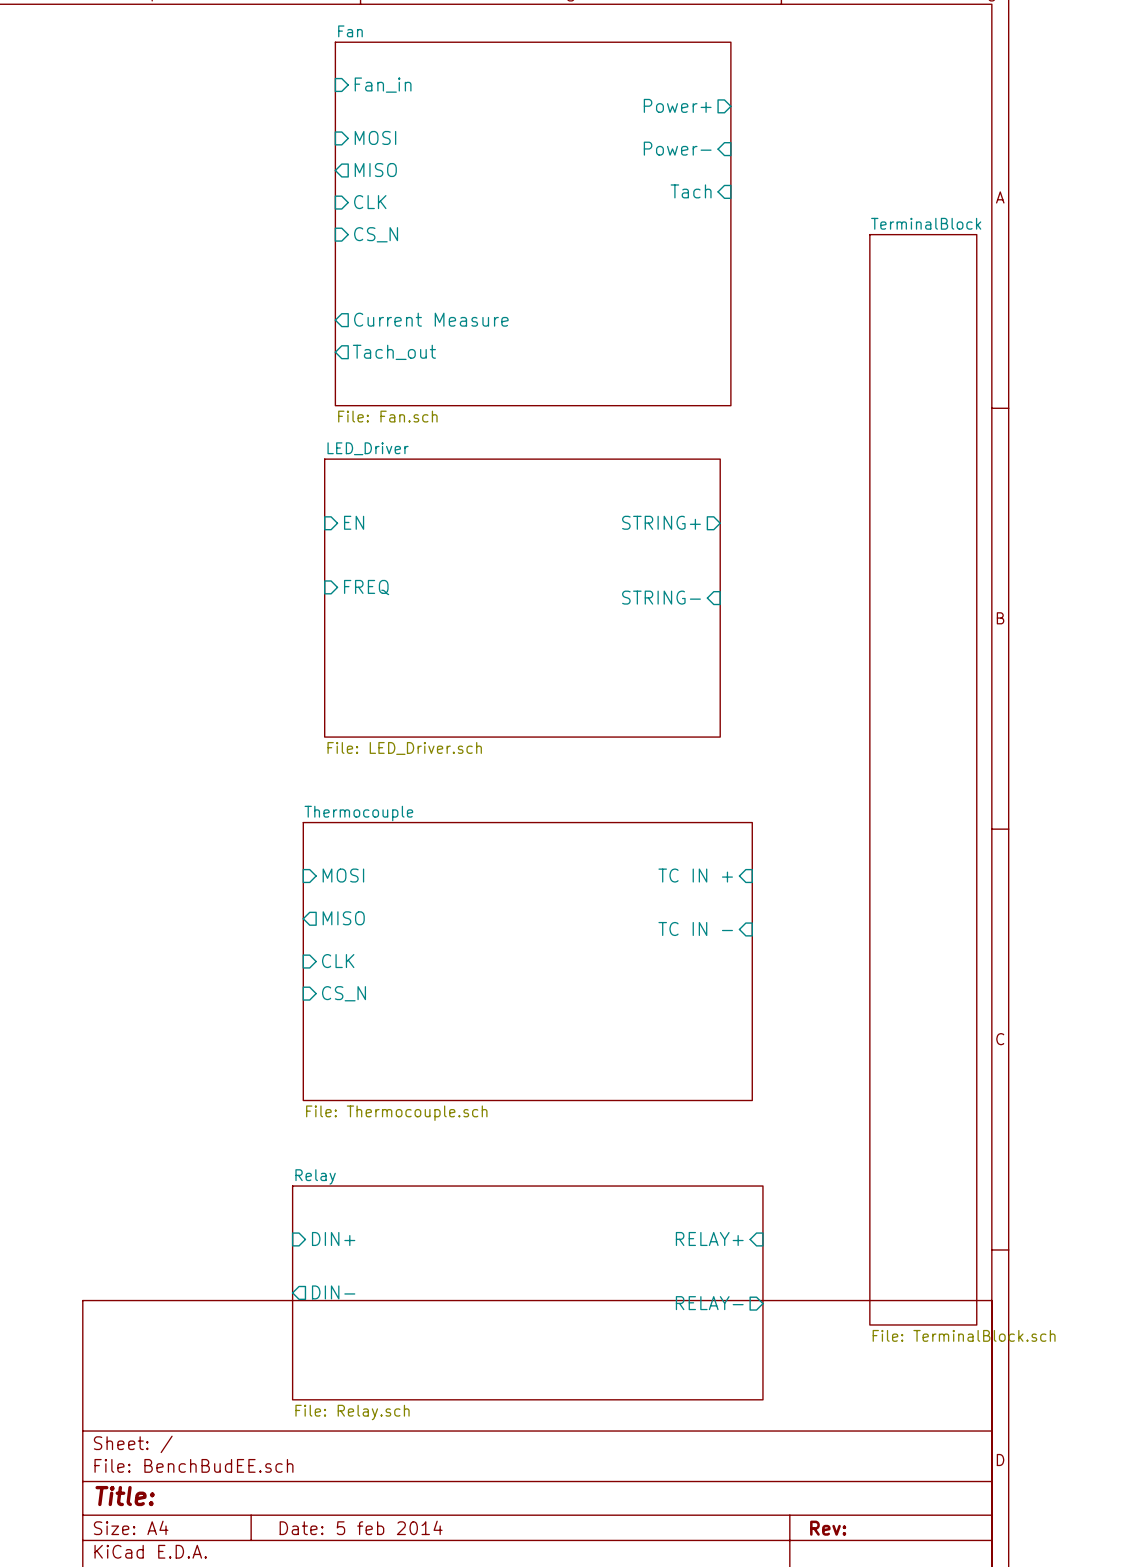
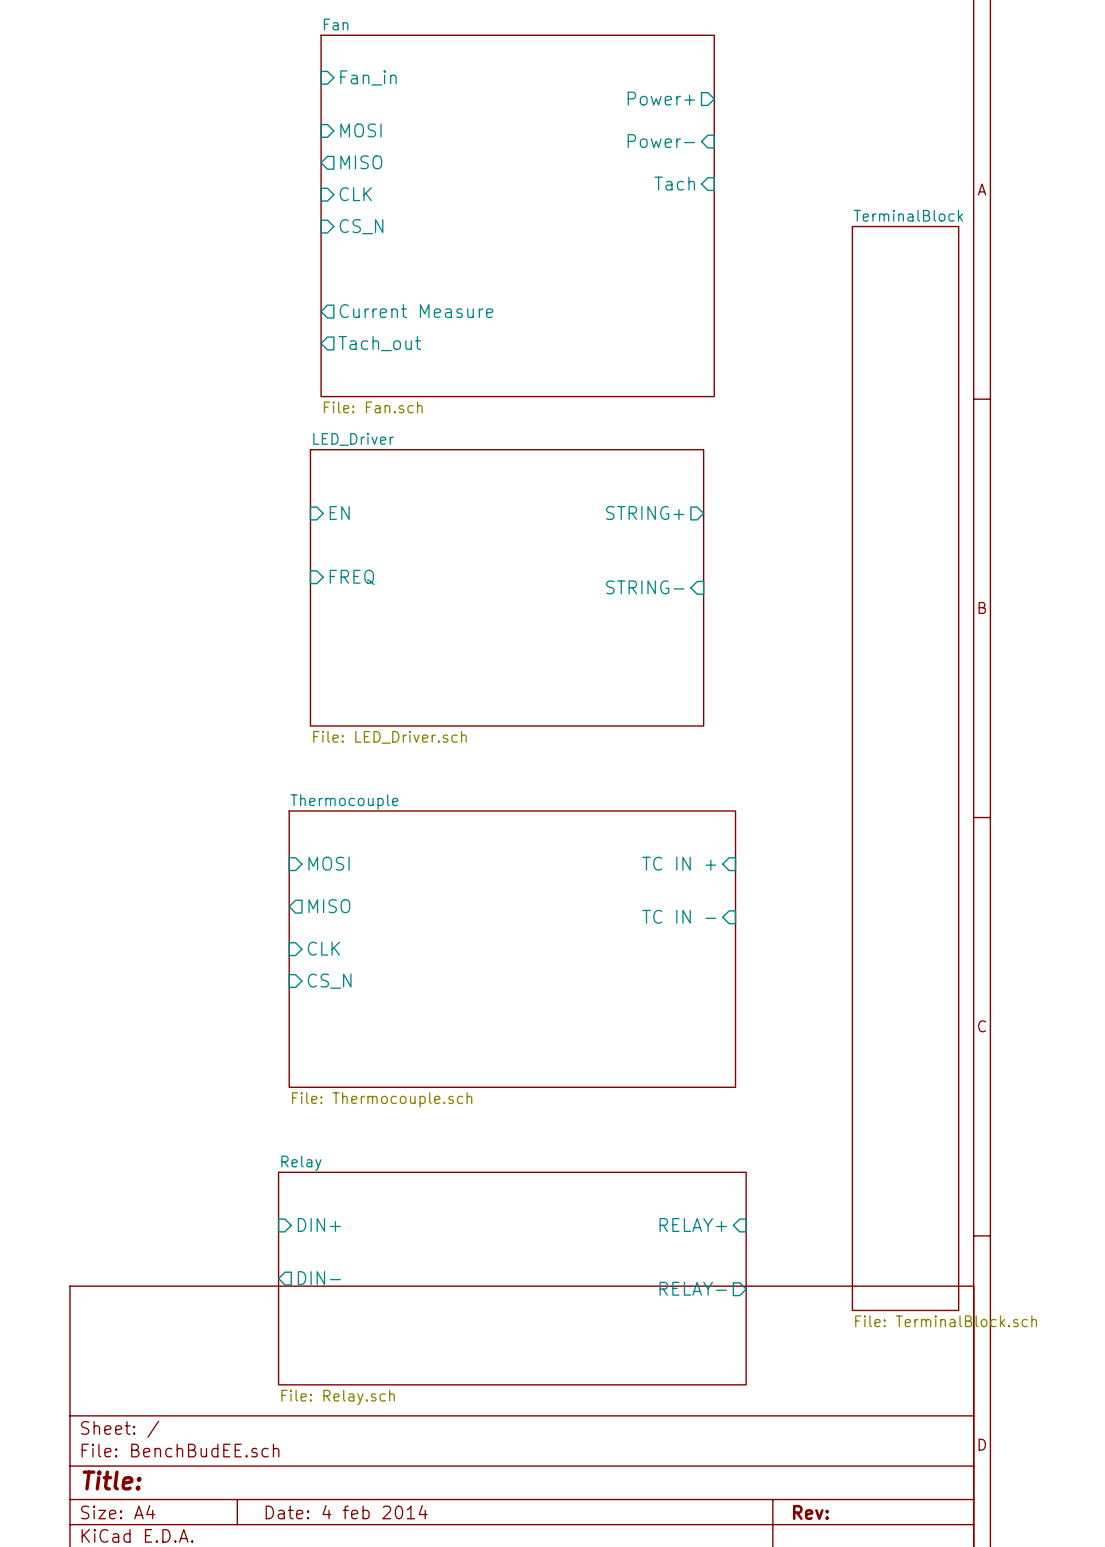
title block: Date: 5 feb 2014 (361, 1527) -> Date: 4 feb 2014 (346, 1512)

